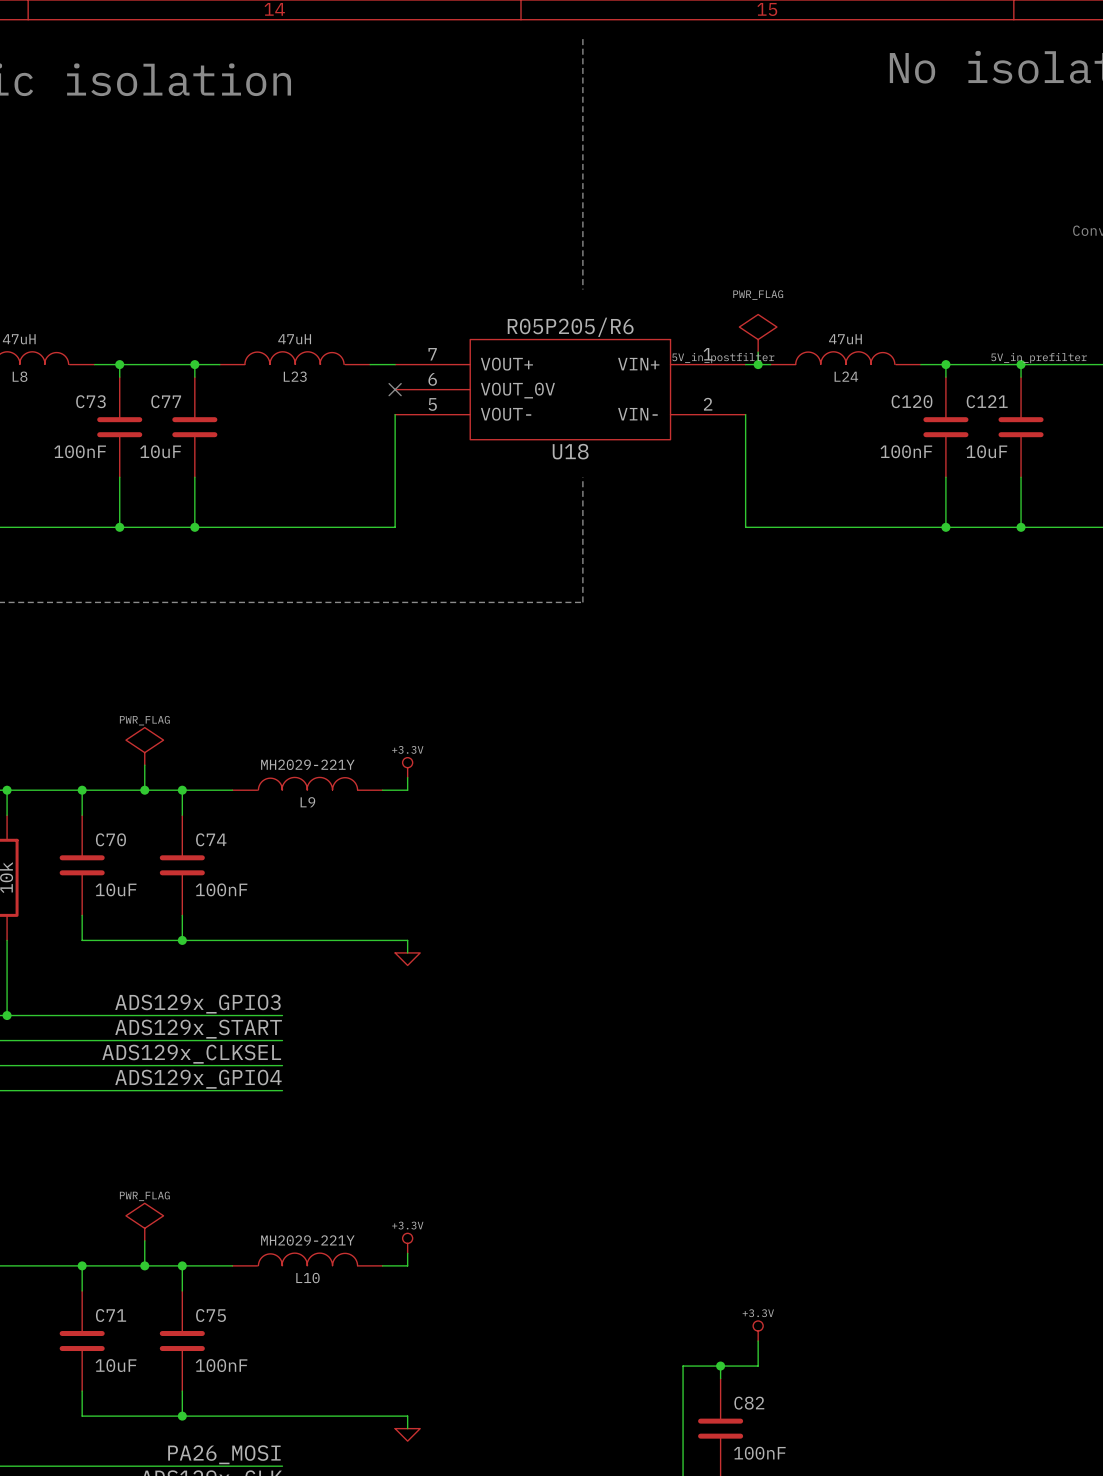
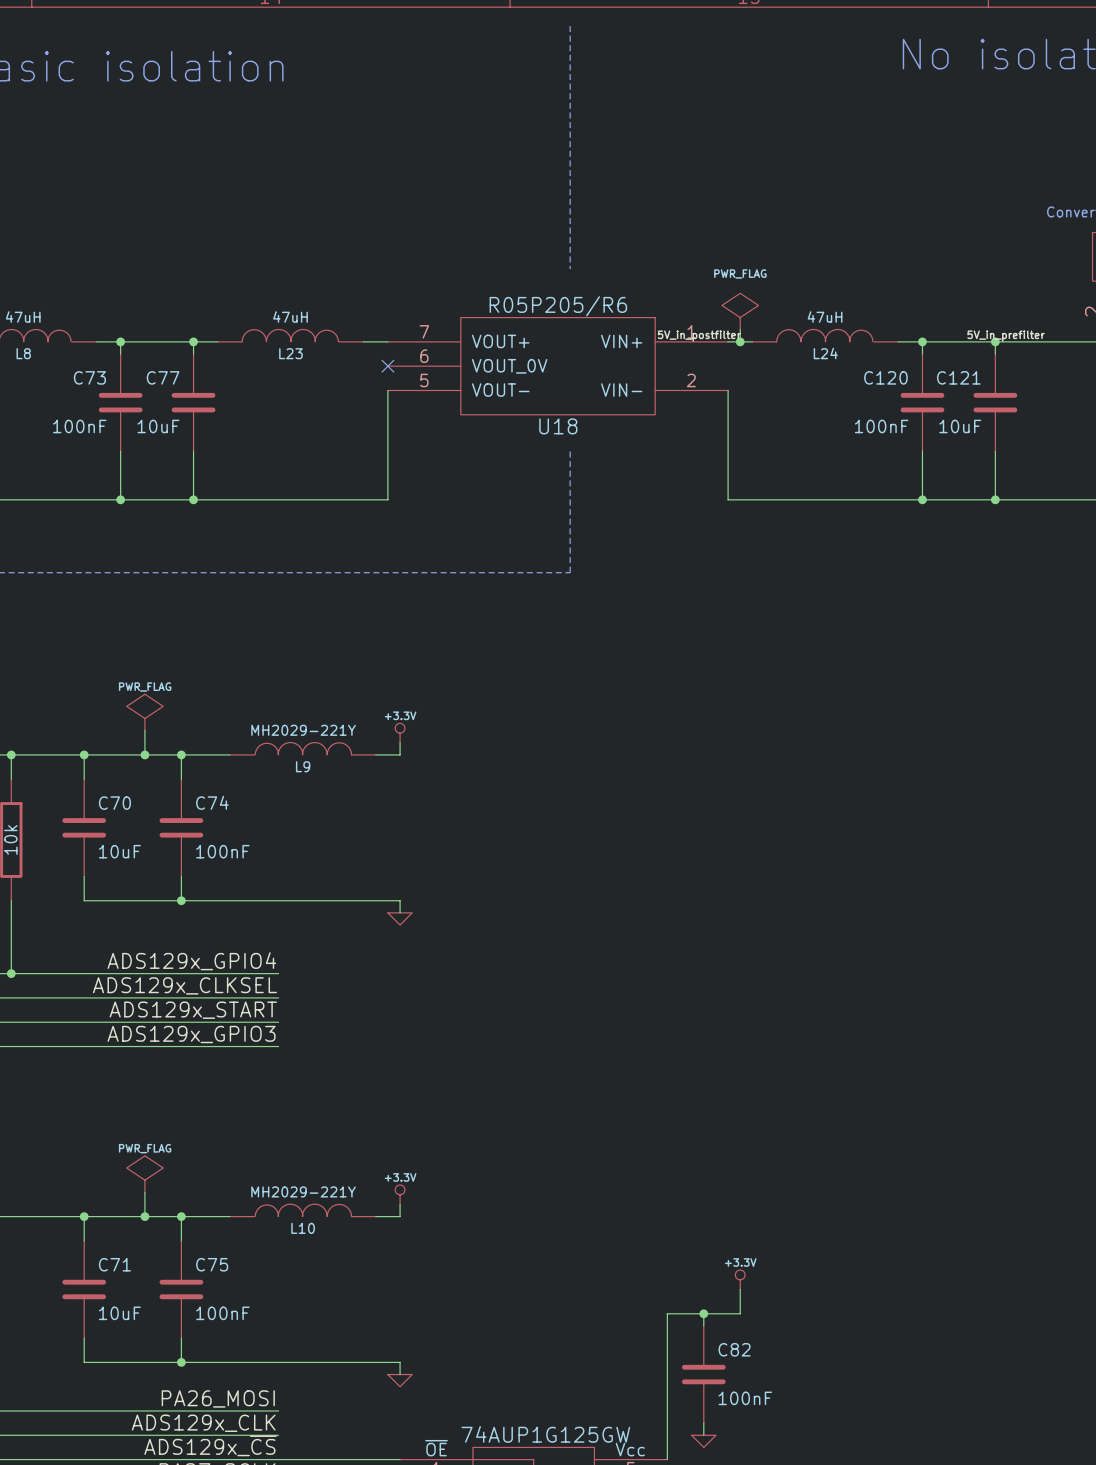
label: ADS129x_GPIO3 (197, 1004) -> ADS129x_GPIO4 (191, 961)
label: ADS129x_START (198, 1029) -> ADS129x_CLKSEL (184, 985)
label: ADS129x_CLKSEL (191, 1054) -> ADS129x_START (193, 1010)
label: ADS129x_GPIO4 (198, 1079) -> ADS129x_GPIO3 (191, 1034)

